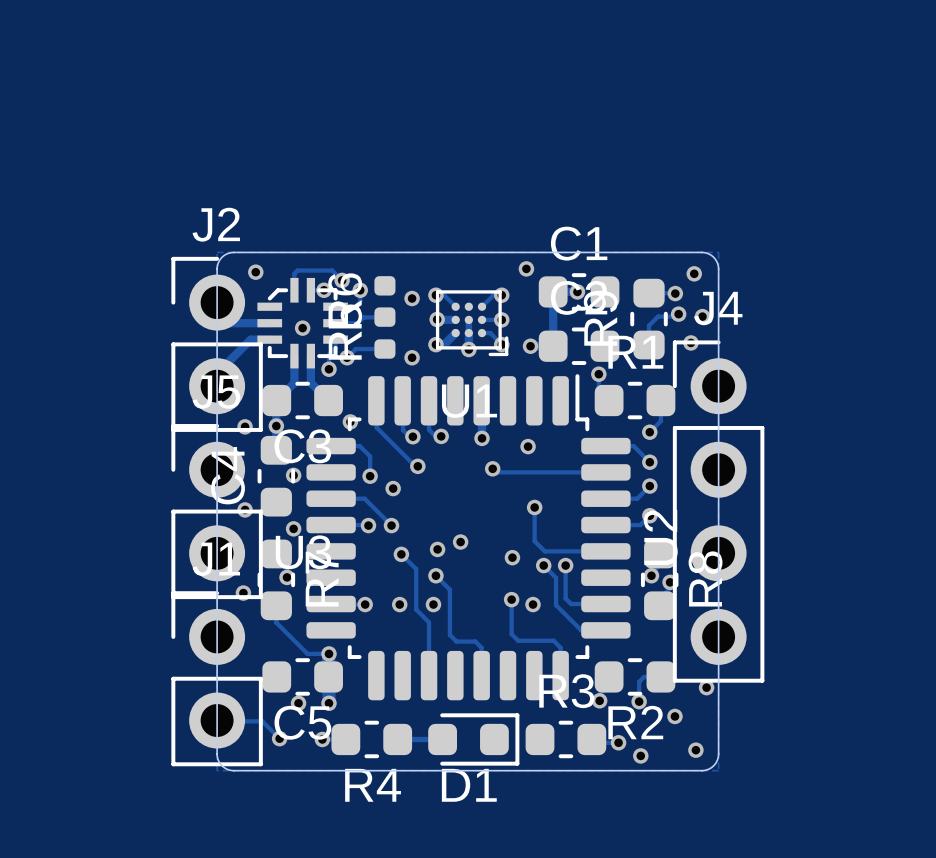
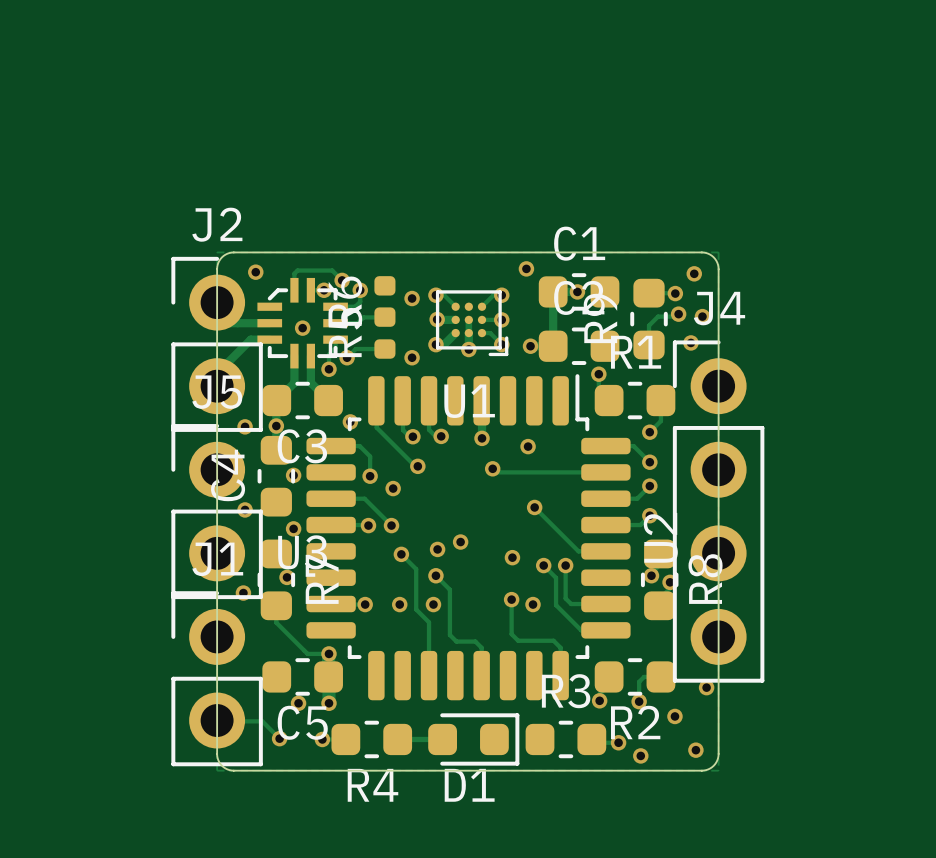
track: (534, 507) (534, 541) (544, 551) (578, 551) -> (534, 507) (578, 551)

